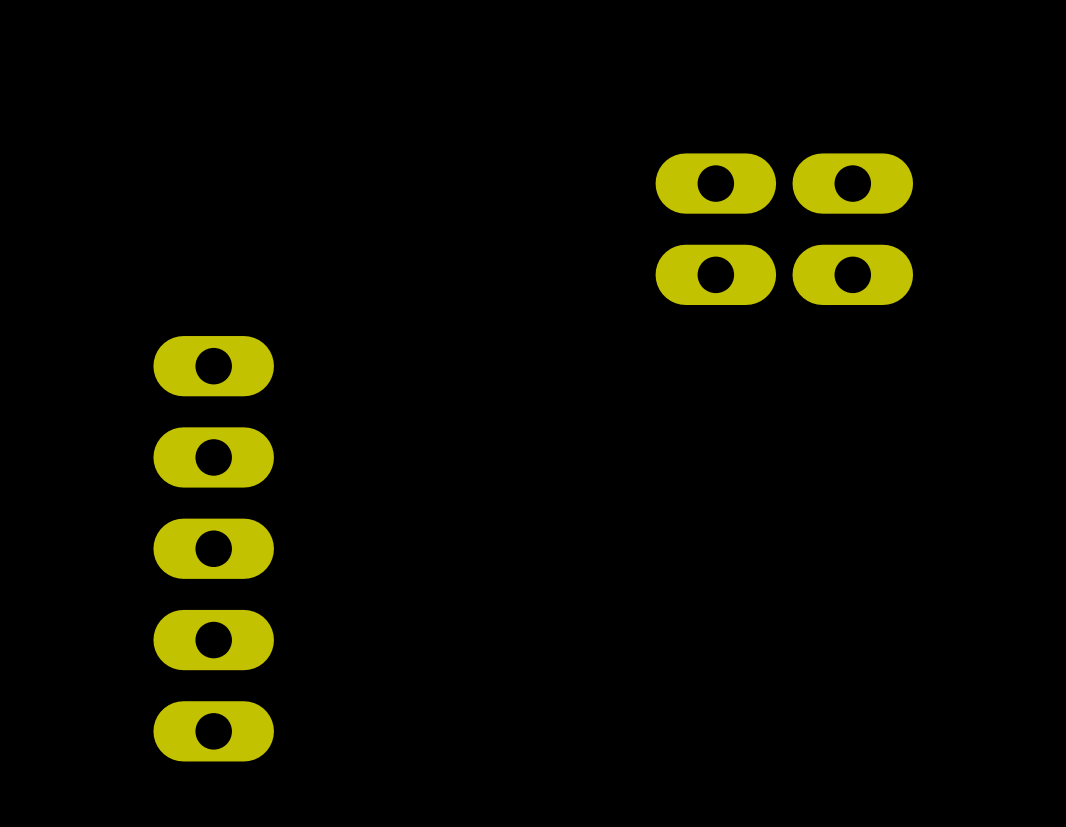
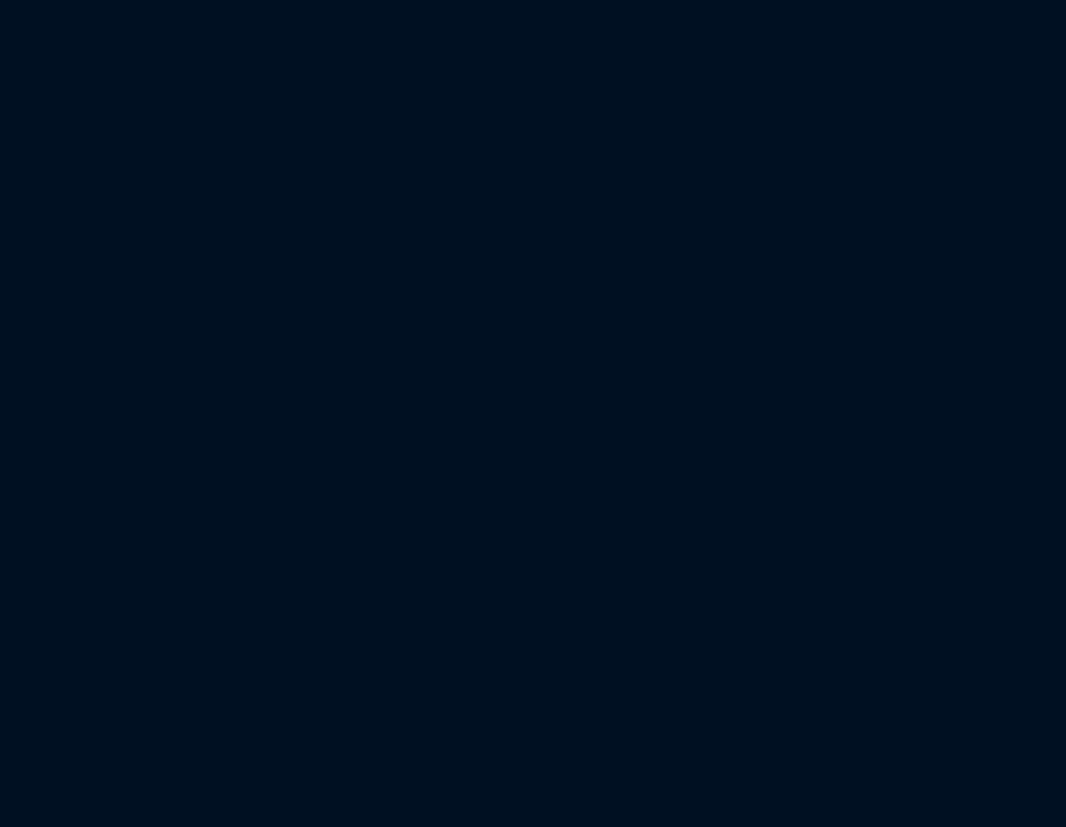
part: (715, 229) -> none
part: (852, 229) -> none
part: (213, 548) -> none

